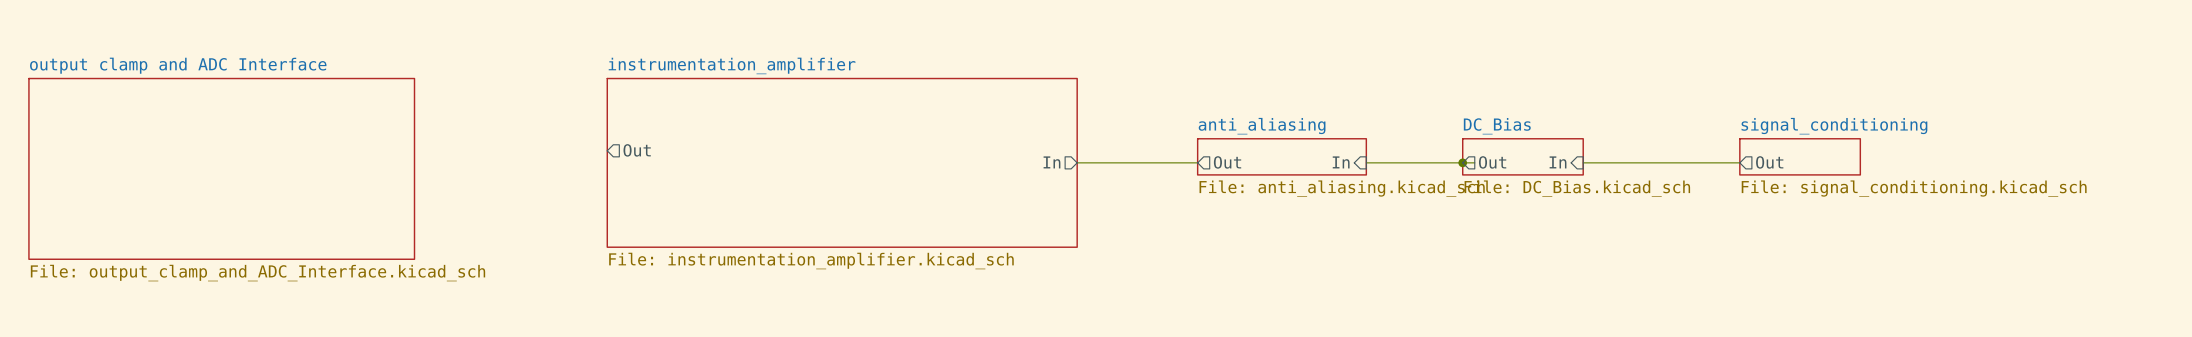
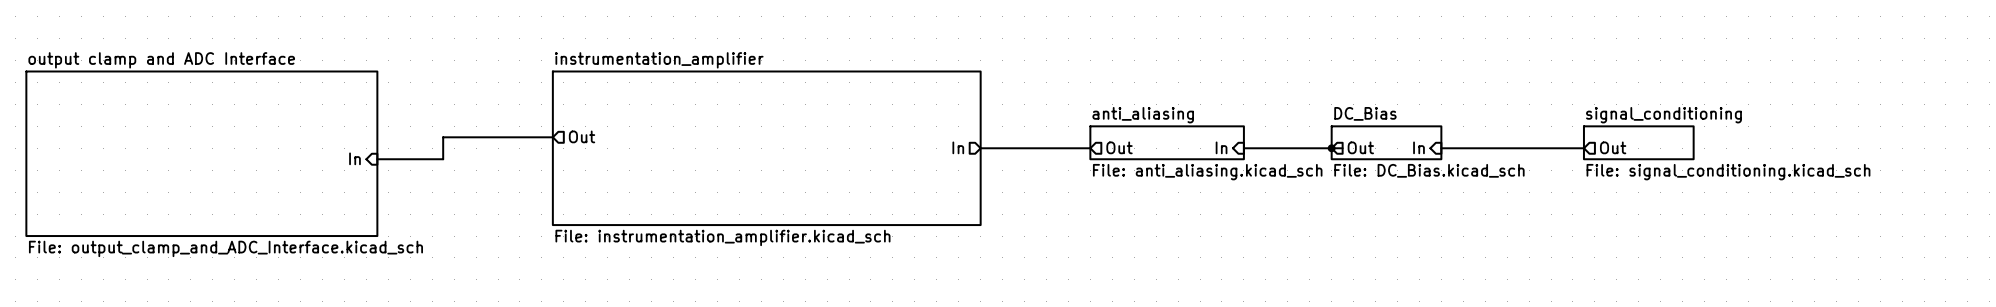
wire: none -> (552, 137) (443, 137) (443, 159) (377, 159)
sheet pin: none -> In (354, 158)

